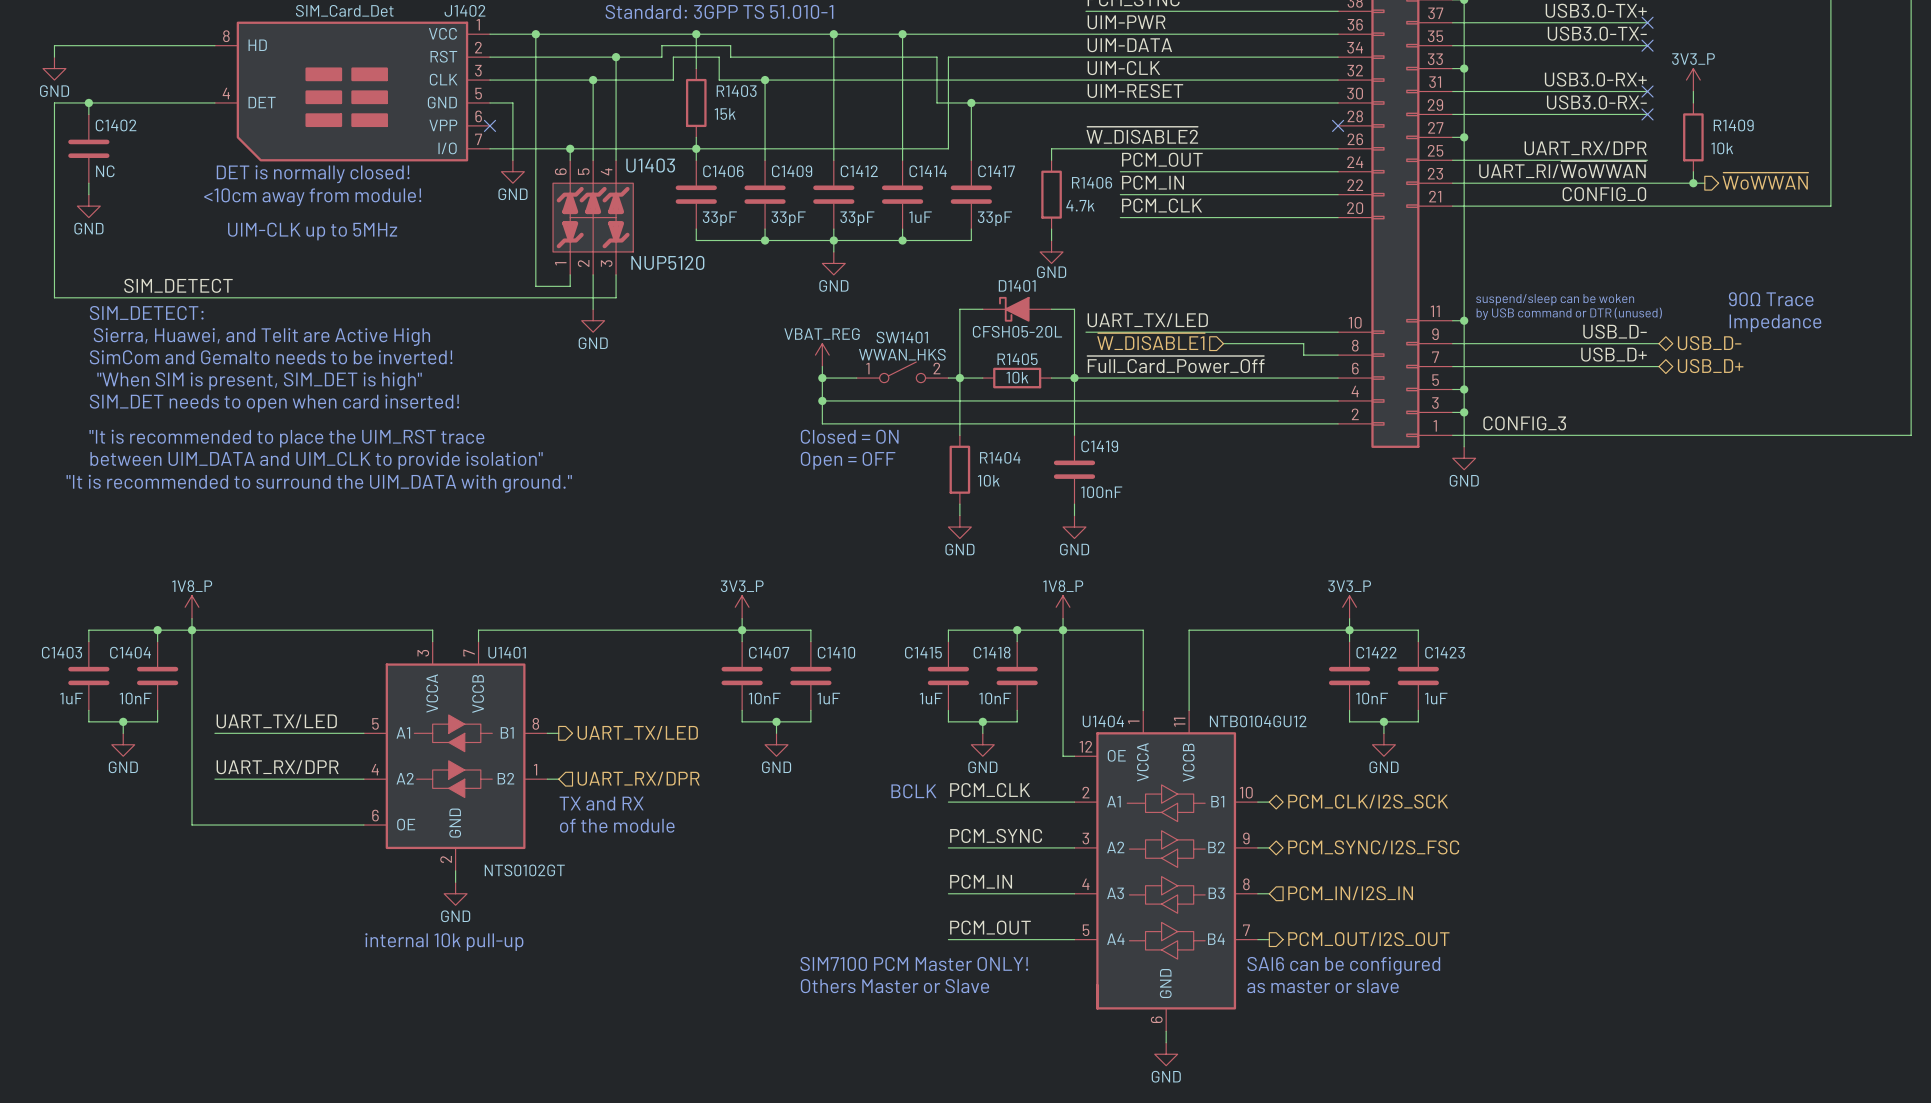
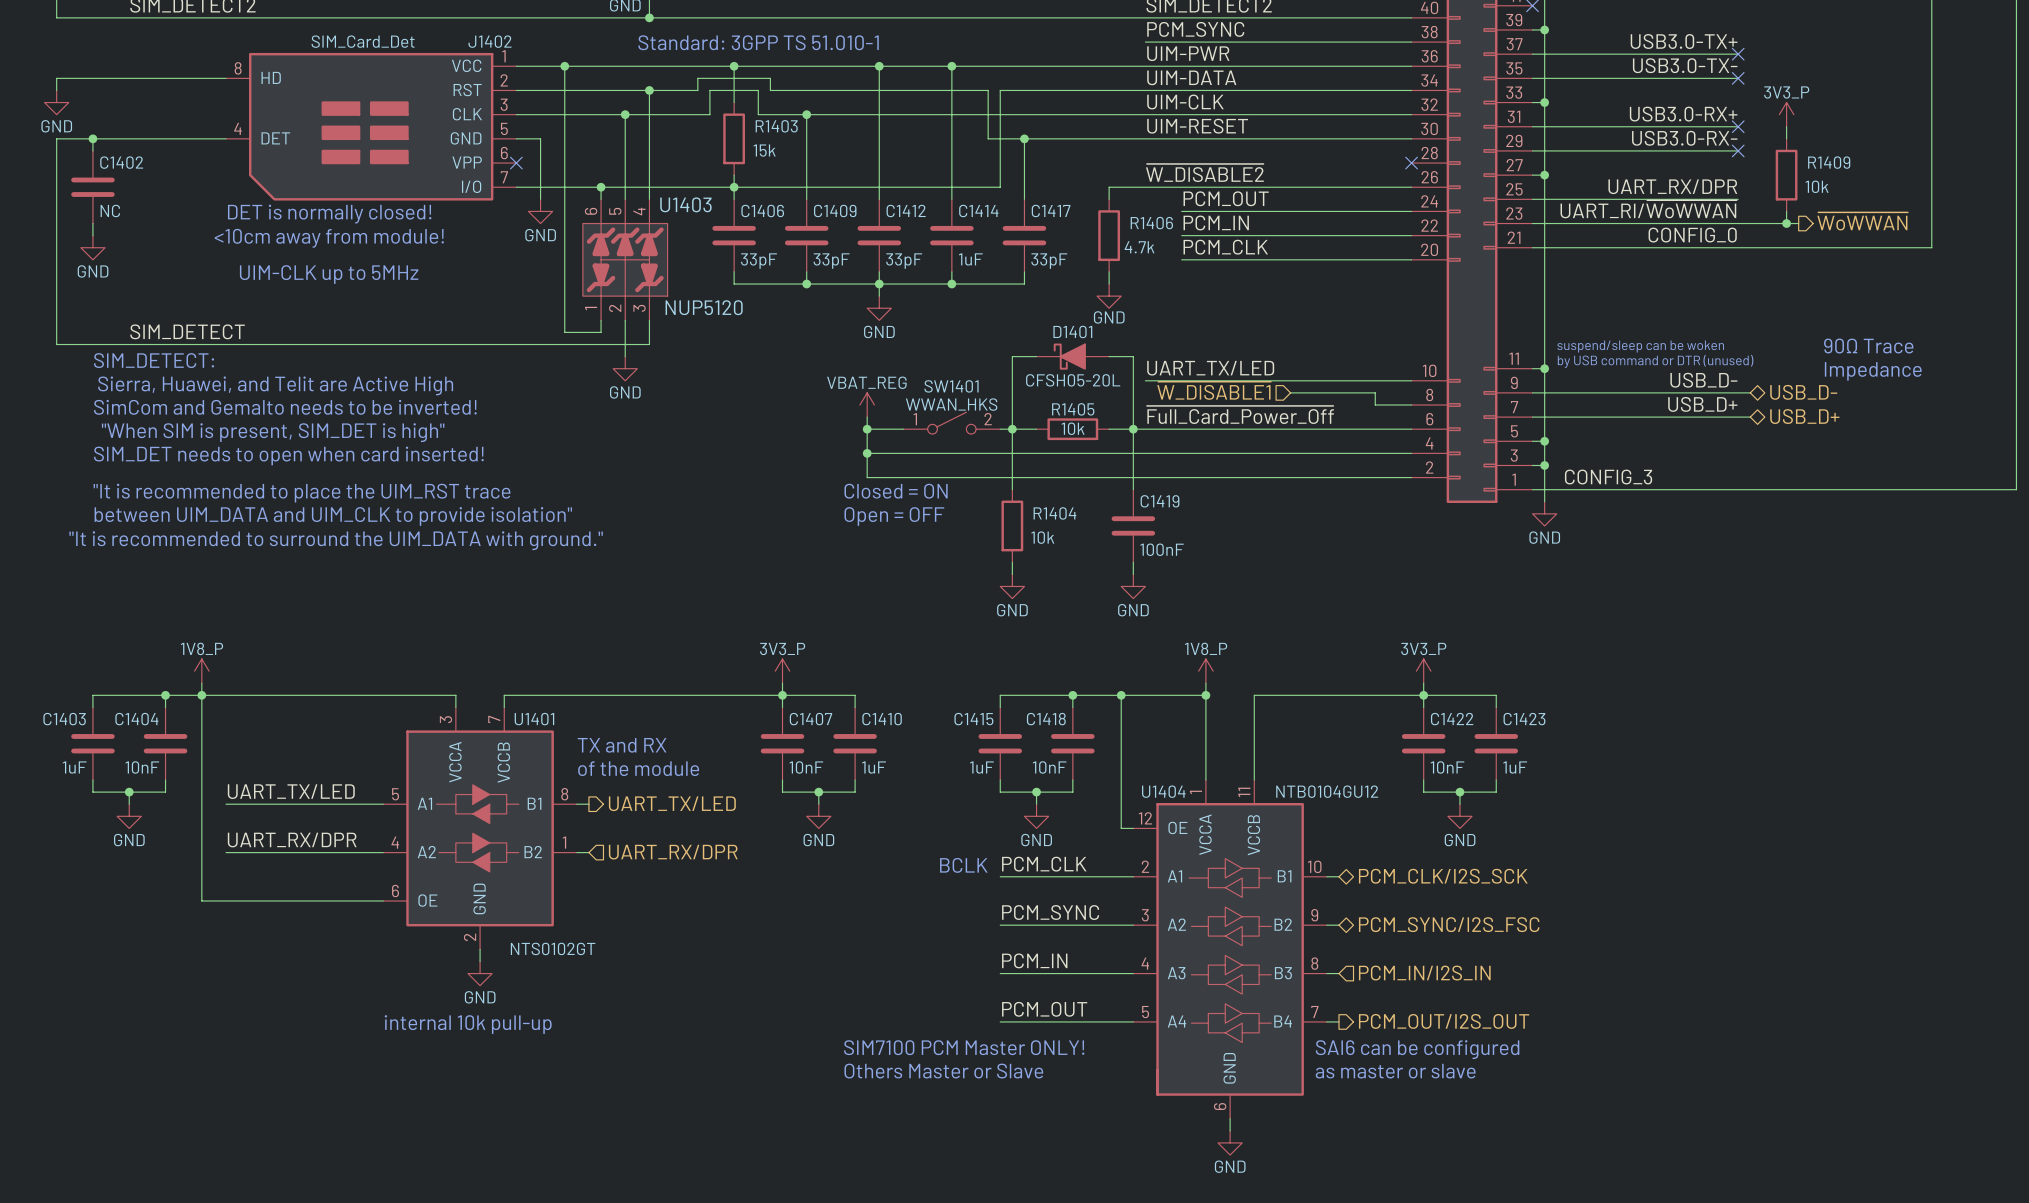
power symbol position: 1V8_P (1063, 607) -> 1V8_P (1205, 671)
wire: (1063, 618) (1063, 630) -> (1205, 683) (1205, 695)
junction: none -> (1205, 695)
text position: TX and RX (601, 803) -> TX and RX (622, 745)
text position: of the module (617, 825) -> of the module (638, 768)

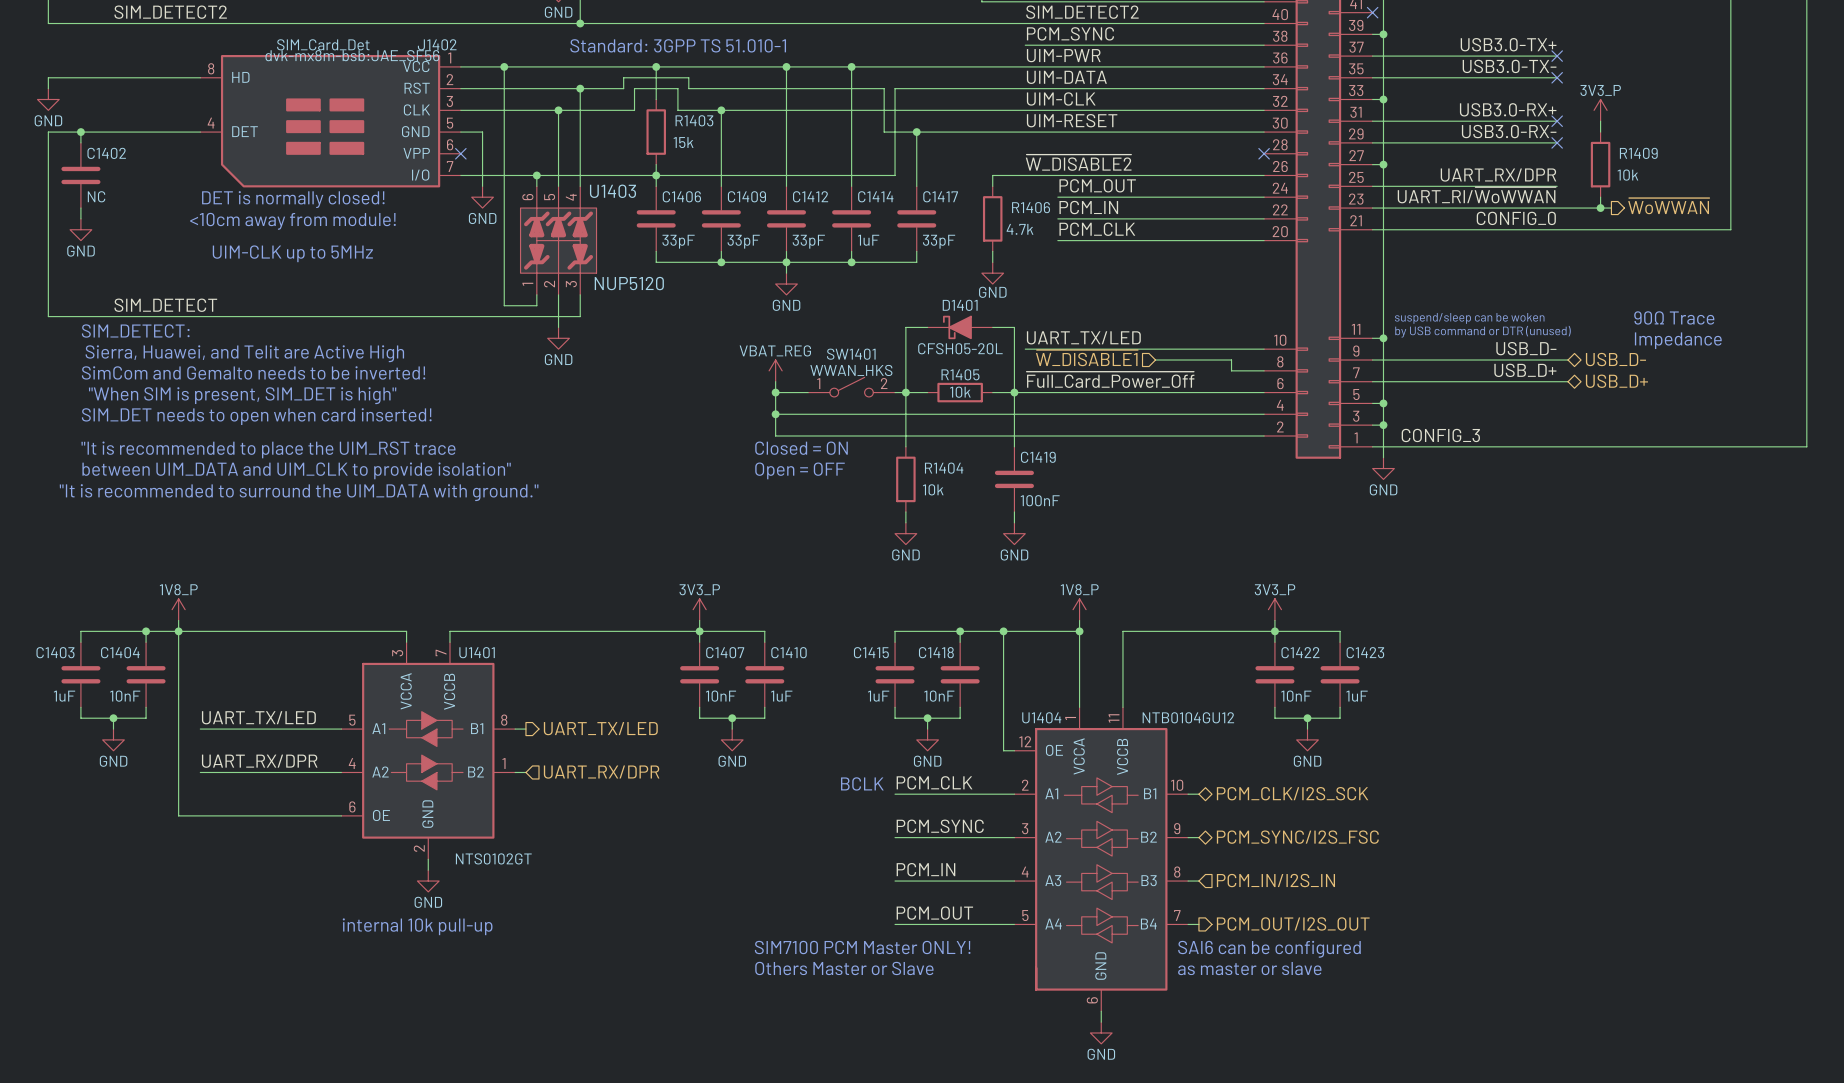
J1402 text: none -> dvk-mx8m-bsb:JAE_SF56 (352, 55)
text: TX and RX (622, 745) -> none
text: of the module (638, 768) -> none

